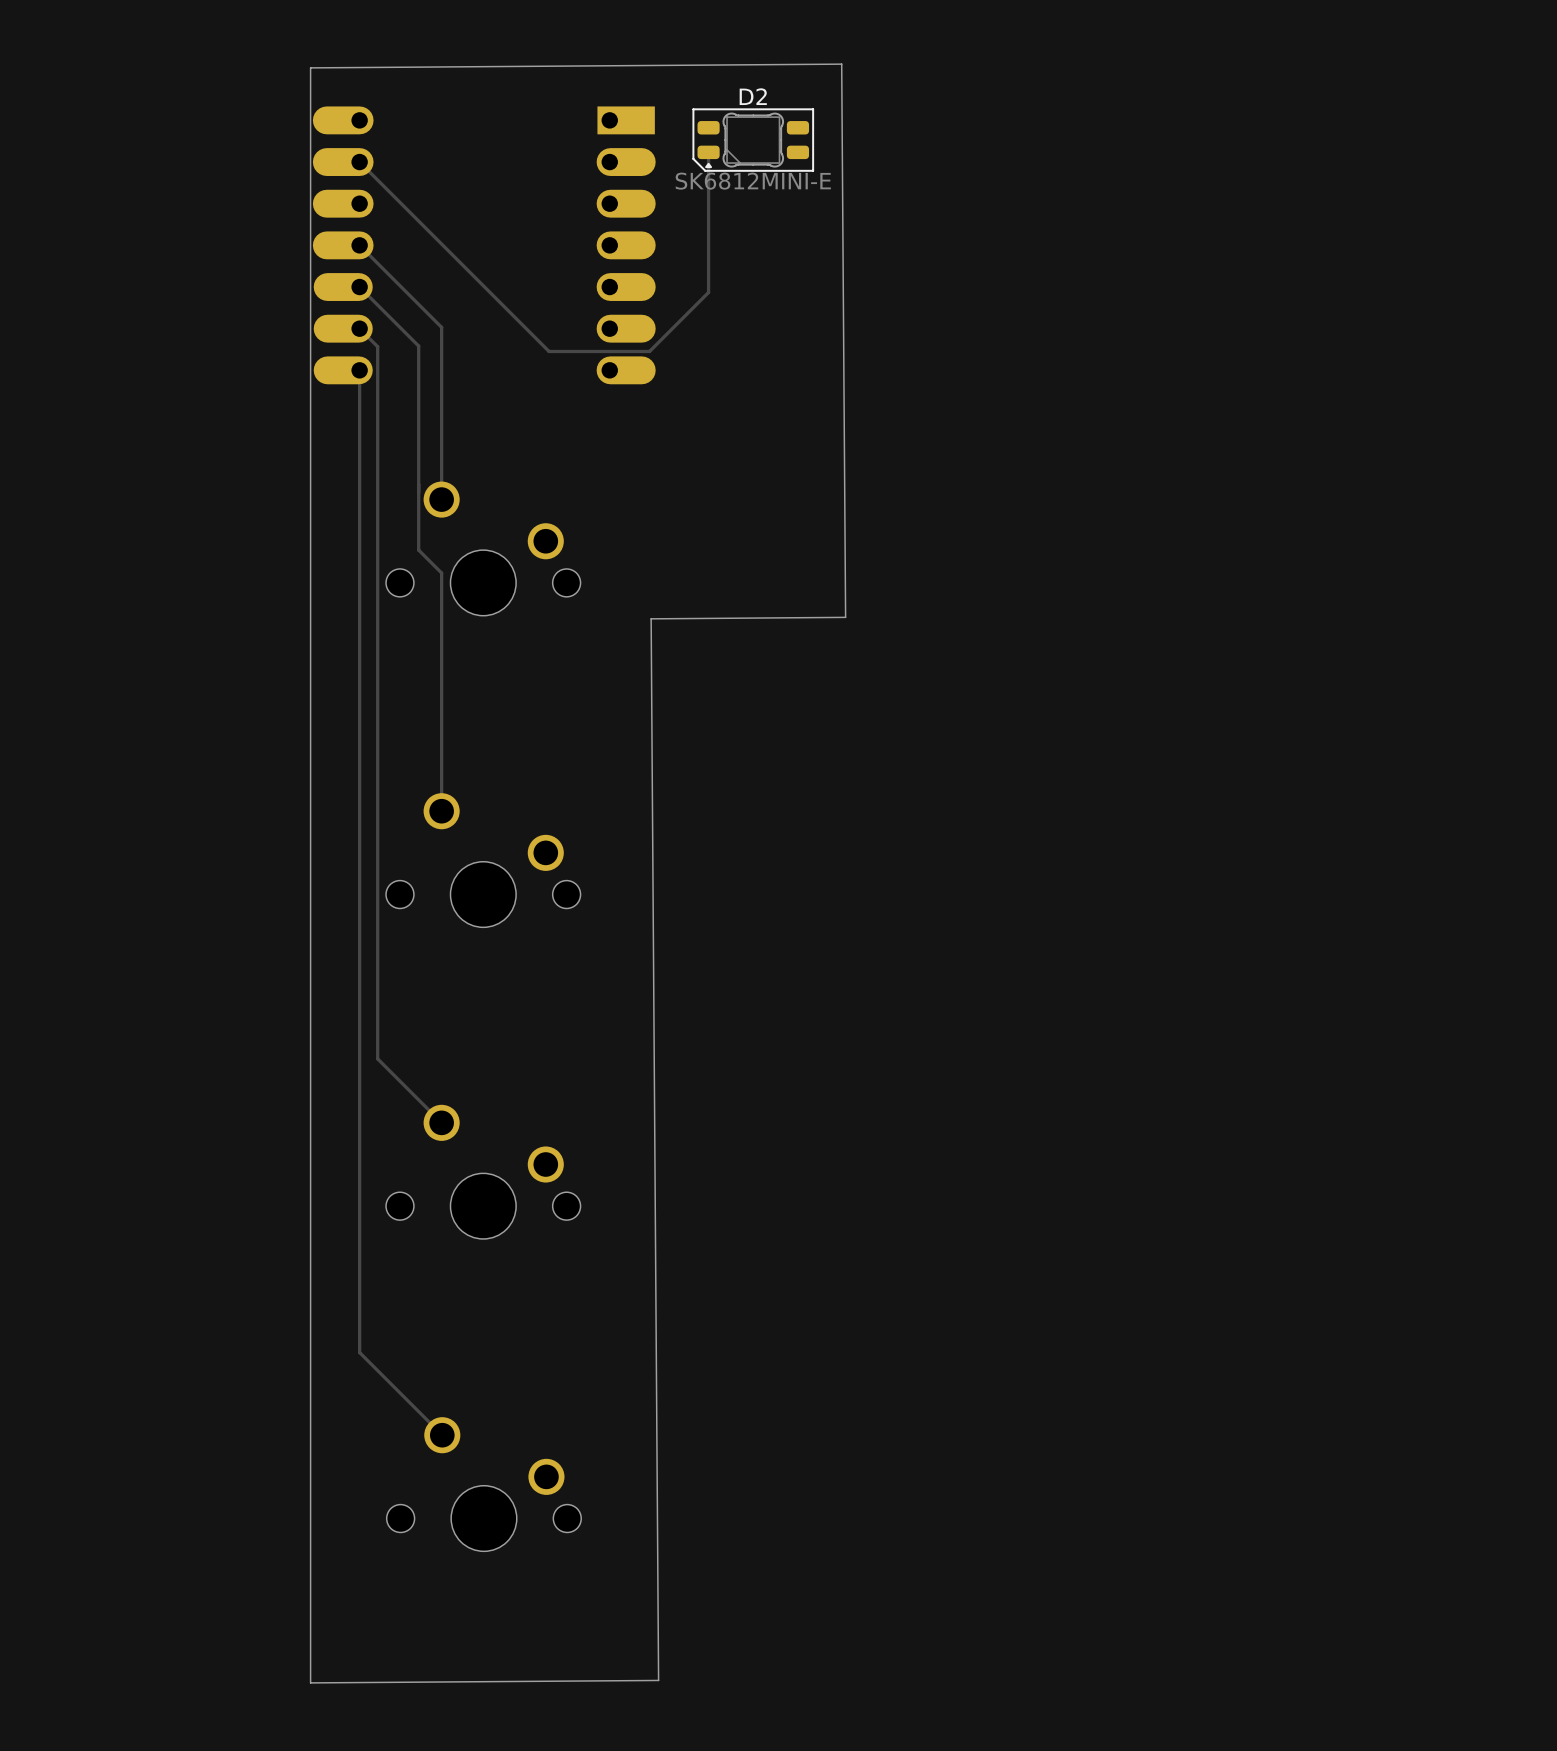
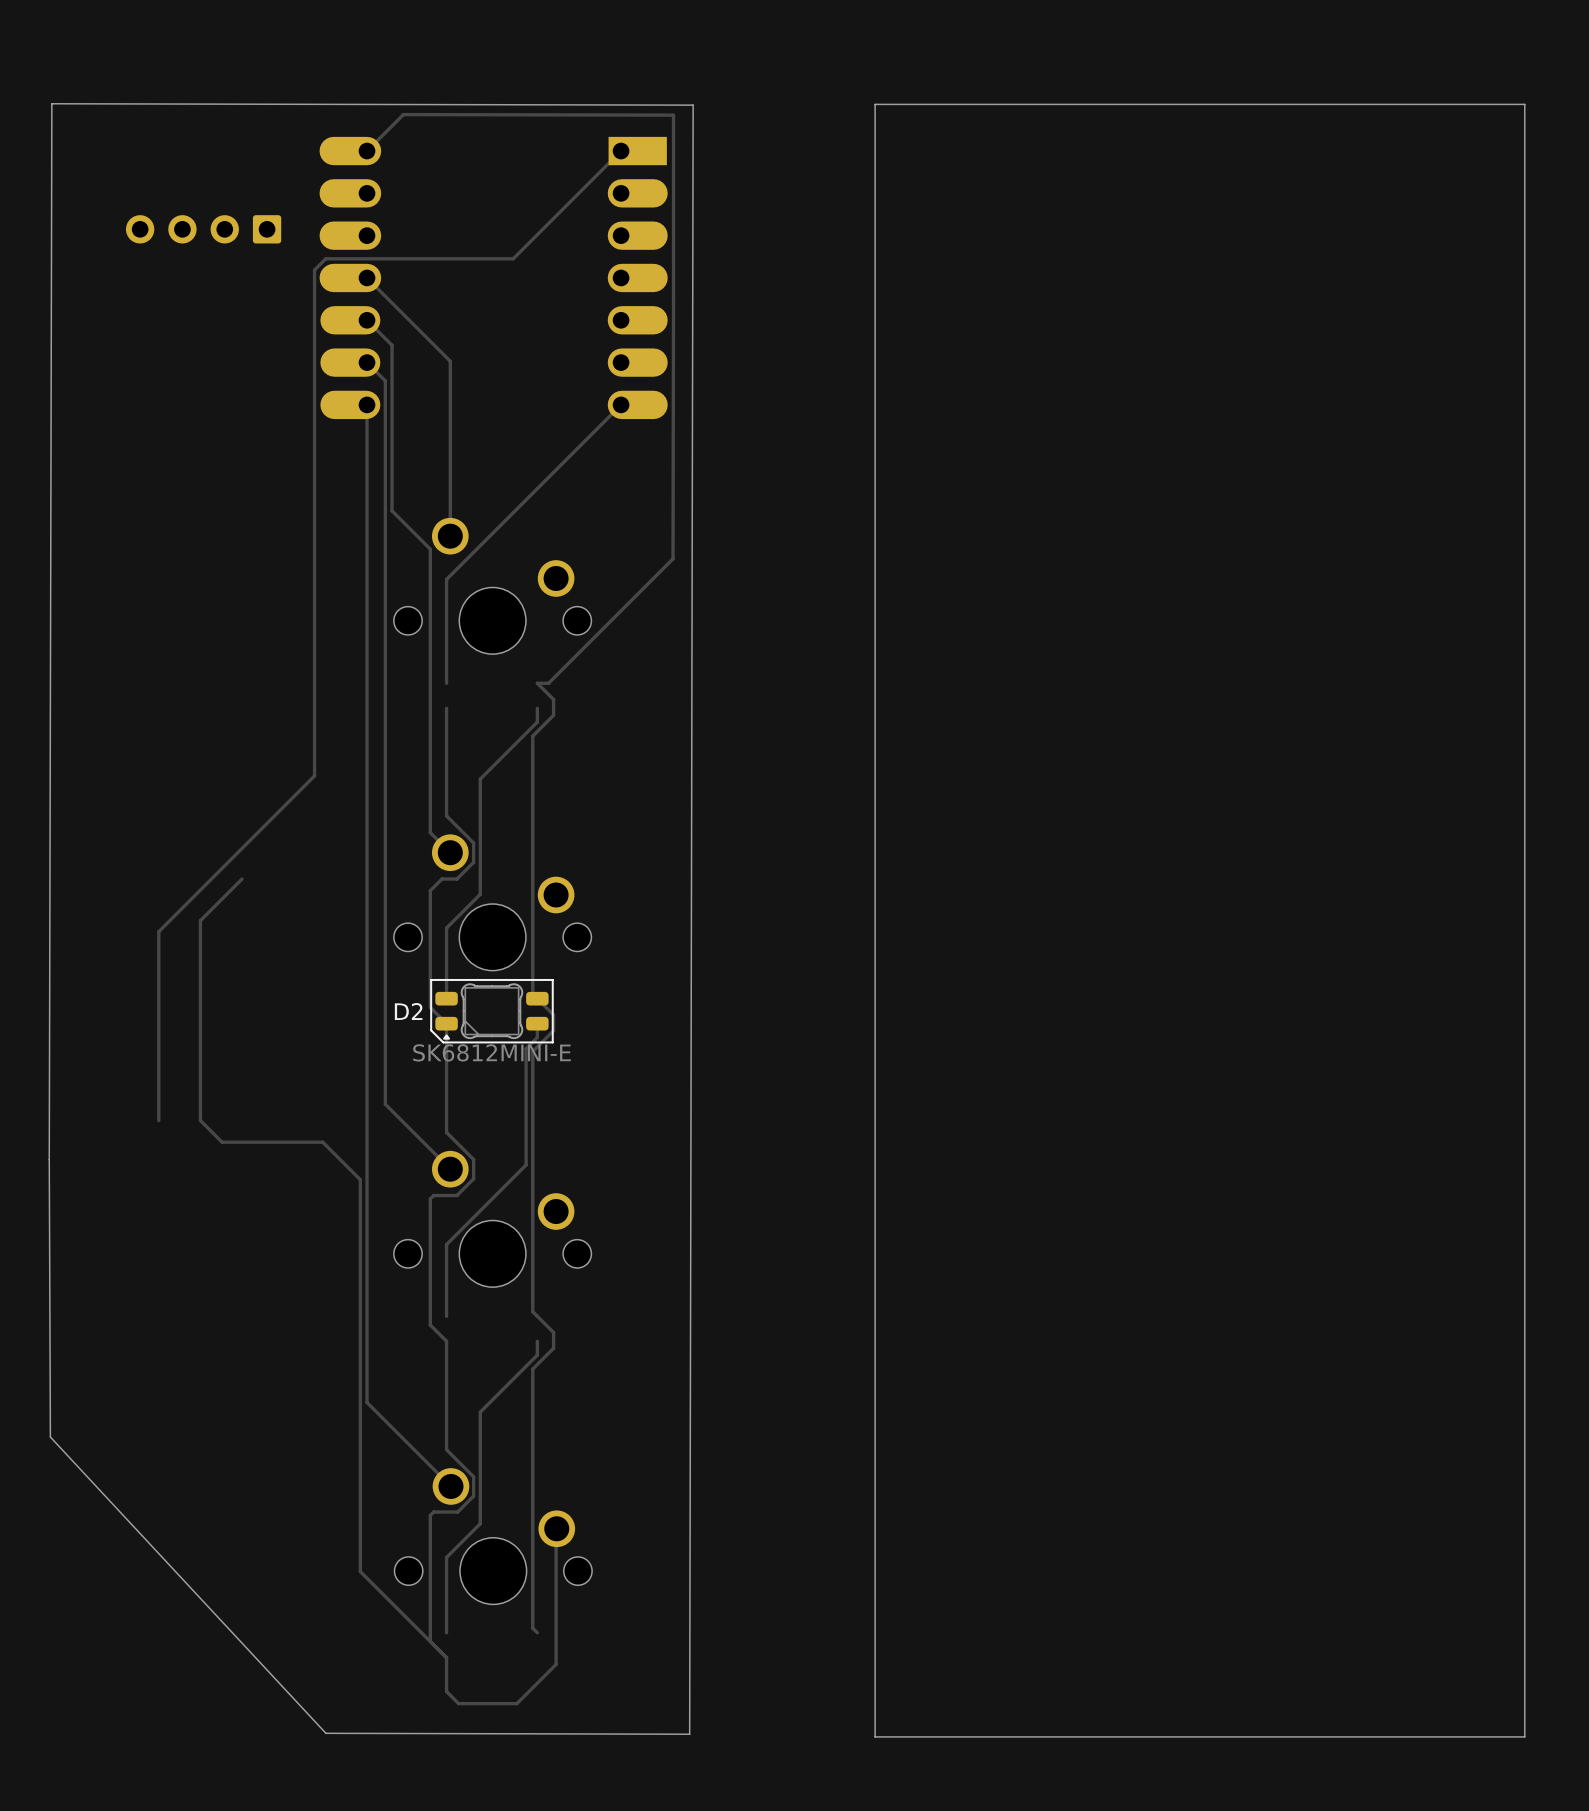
board edge: (841, 64) (310, 67) (310, 1682) (658, 1680) (651, 618) (845, 617) (841, 64) -> none
board edge: none -> (51, 103) (693, 105) (689, 1734) (325, 1733) (50, 1437) (51, 103)
board edge: none -> (1524, 104) (875, 104) (875, 1736) (1524, 1736) (1524, 104)
D2 name position: D2 (753, 96) -> D2 (408, 1011)
track: none -> (367, 151) (403, 114) (673, 115) (673, 558) (548, 683) (537, 683) (553, 699) (553, 715) (532, 736) (532, 994) (553, 1014) (553, 1030) (532, 1051) (532, 1311) (553, 1332) (553, 1348) (532, 1369) (532, 1628) (537, 1632)
track: none -> (621, 151) (513, 258) (325, 258) (314, 270) (314, 775) (158, 931) (158, 1120)
D2 position: (753, 140) -> (491, 1011)
track: (708, 152) (708, 292) (649, 351) (549, 351) (359, 162) -> none
part: none -> (203, 229)
track: (384, 311) (418, 346) (418, 550) (441, 573) (441, 811) -> (392, 345) (392, 510) (430, 549) (430, 832) (450, 852)
track: none -> (621, 404) (446, 579) (446, 683)
track: none -> (446, 708) (446, 815) (473, 843) (473, 862) (456, 879) (441, 879) (430, 890) (430, 1007) (446, 1023) (446, 1132) (473, 1159) (473, 1178) (456, 1195) (433, 1195) (430, 1198) (430, 1325) (446, 1341) (446, 1449) (473, 1476) (473, 1496) (457, 1512) (433, 1512) (430, 1515) (430, 1641)
track: none -> (537, 708) (537, 722) (480, 779) (480, 894) (446, 928) (446, 998)
track: none -> (242, 879) (200, 920) (200, 1120) (222, 1142) (322, 1142) (360, 1179) (360, 1571) (446, 1657) (446, 1691) (458, 1703) (516, 1703) (556, 1664) (556, 1528)
track: none -> (537, 1023) (537, 1037) (526, 1048) (526, 1164) (446, 1244) (446, 1316)
track: none -> (537, 1341) (537, 1355) (480, 1412) (480, 1523) (446, 1557) (446, 1632)

